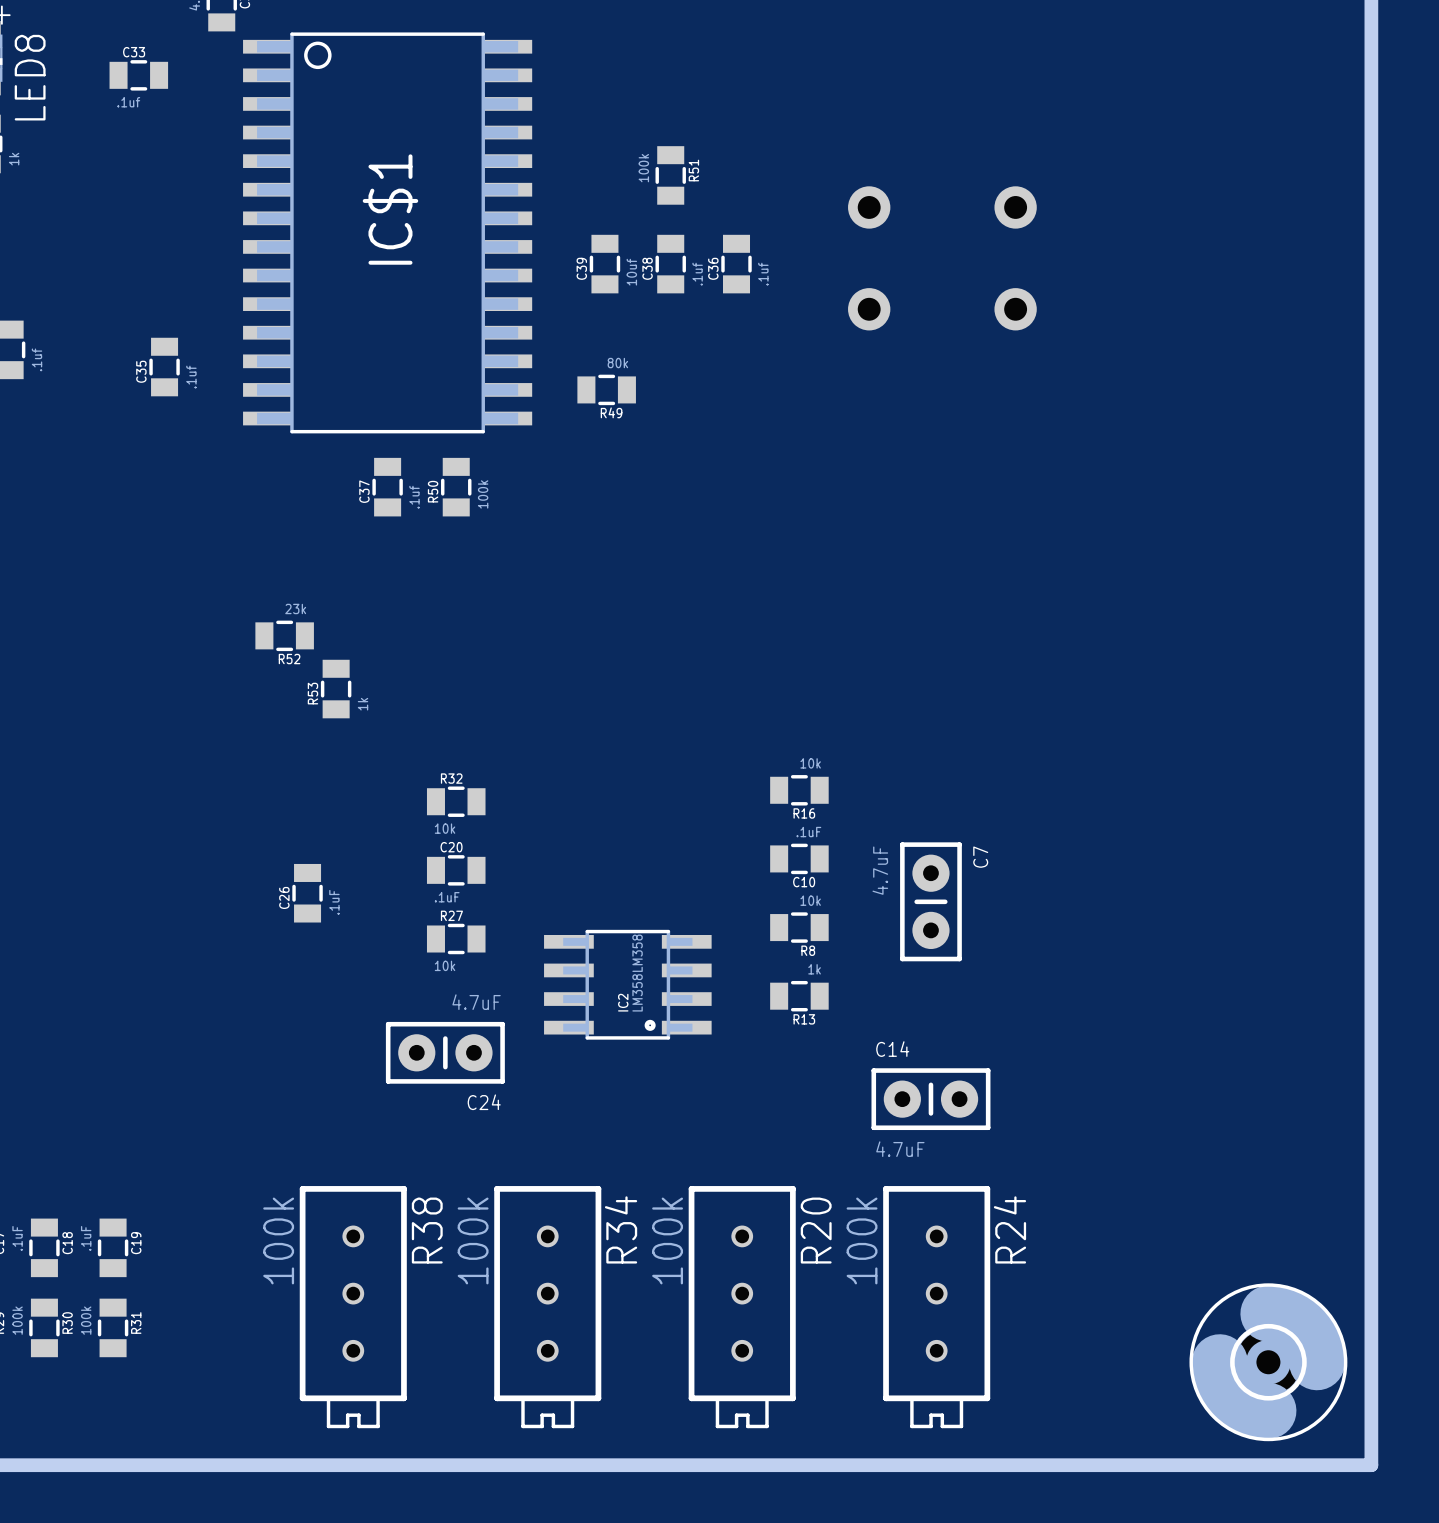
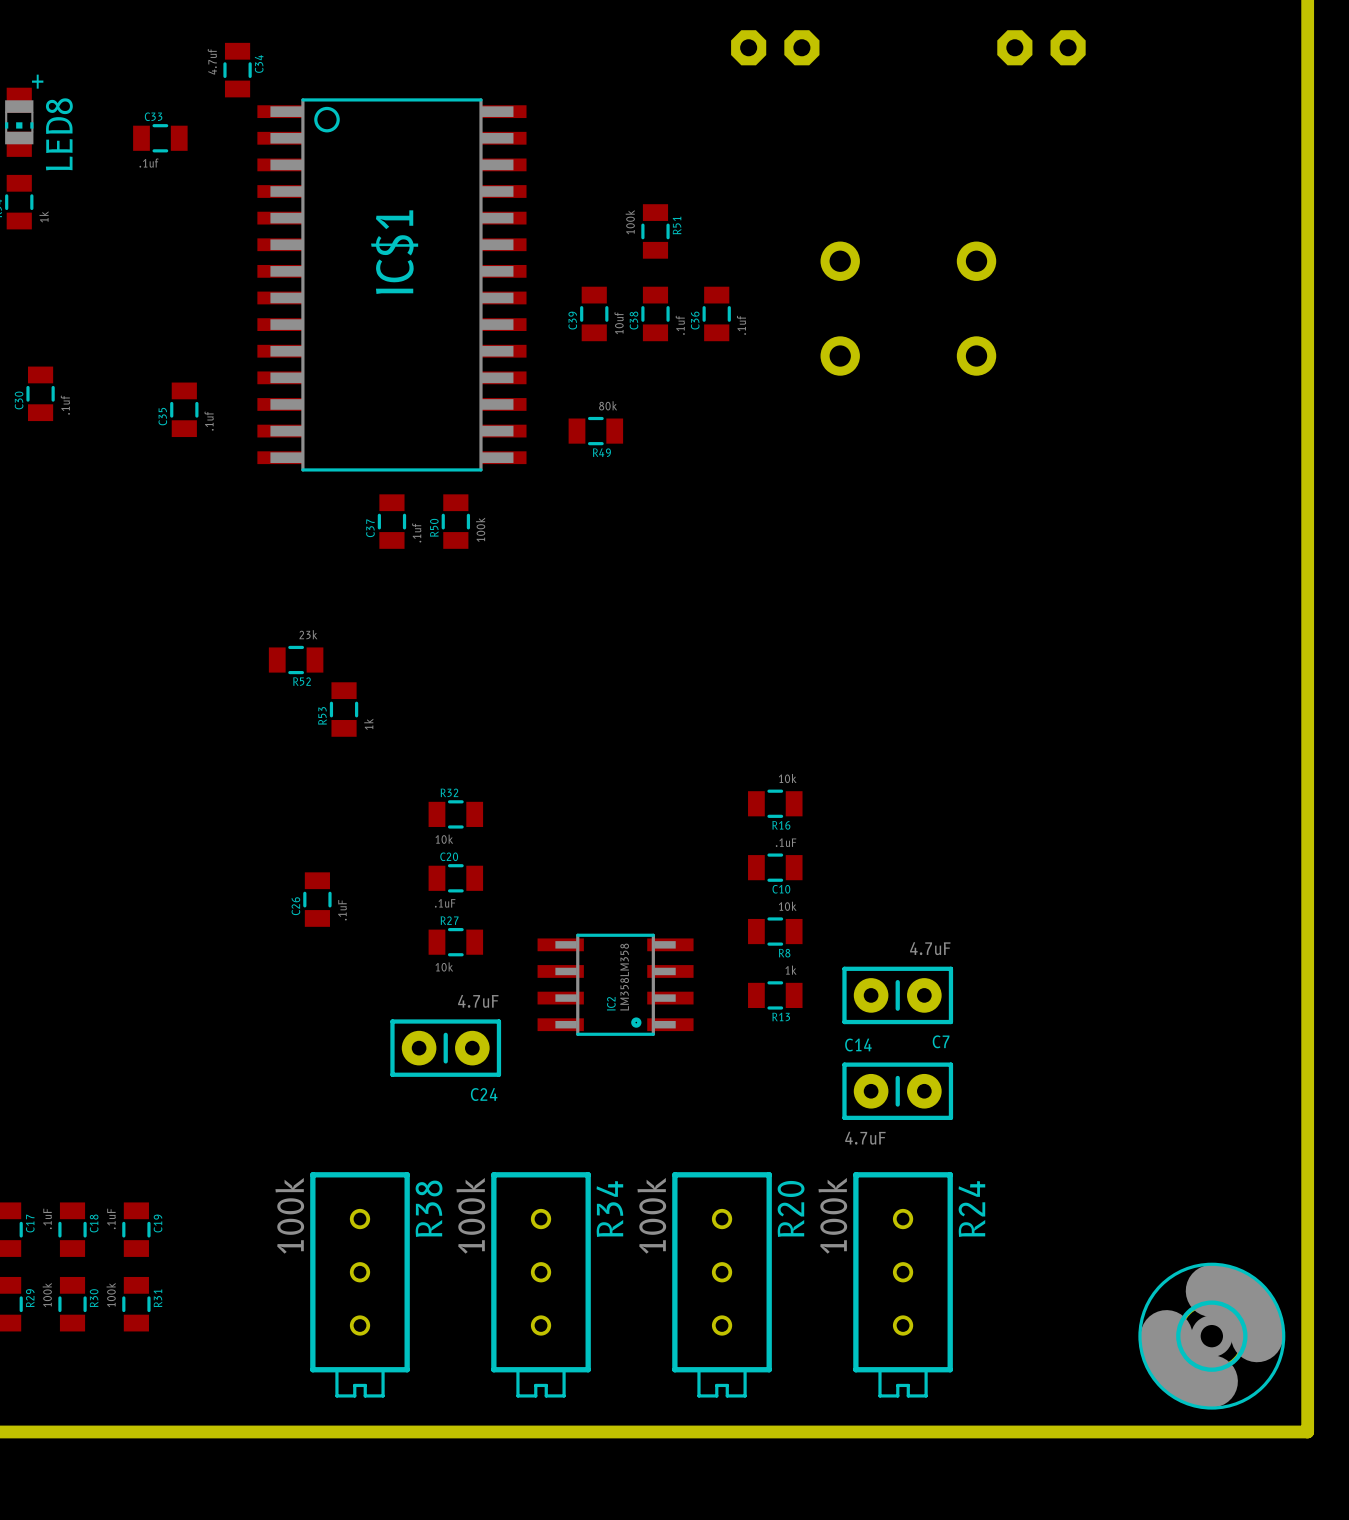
C7 rotation: 0° (930, 901) -> 90° clockwise (897, 995)
C7 position: (930, 901) -> (897, 995)

